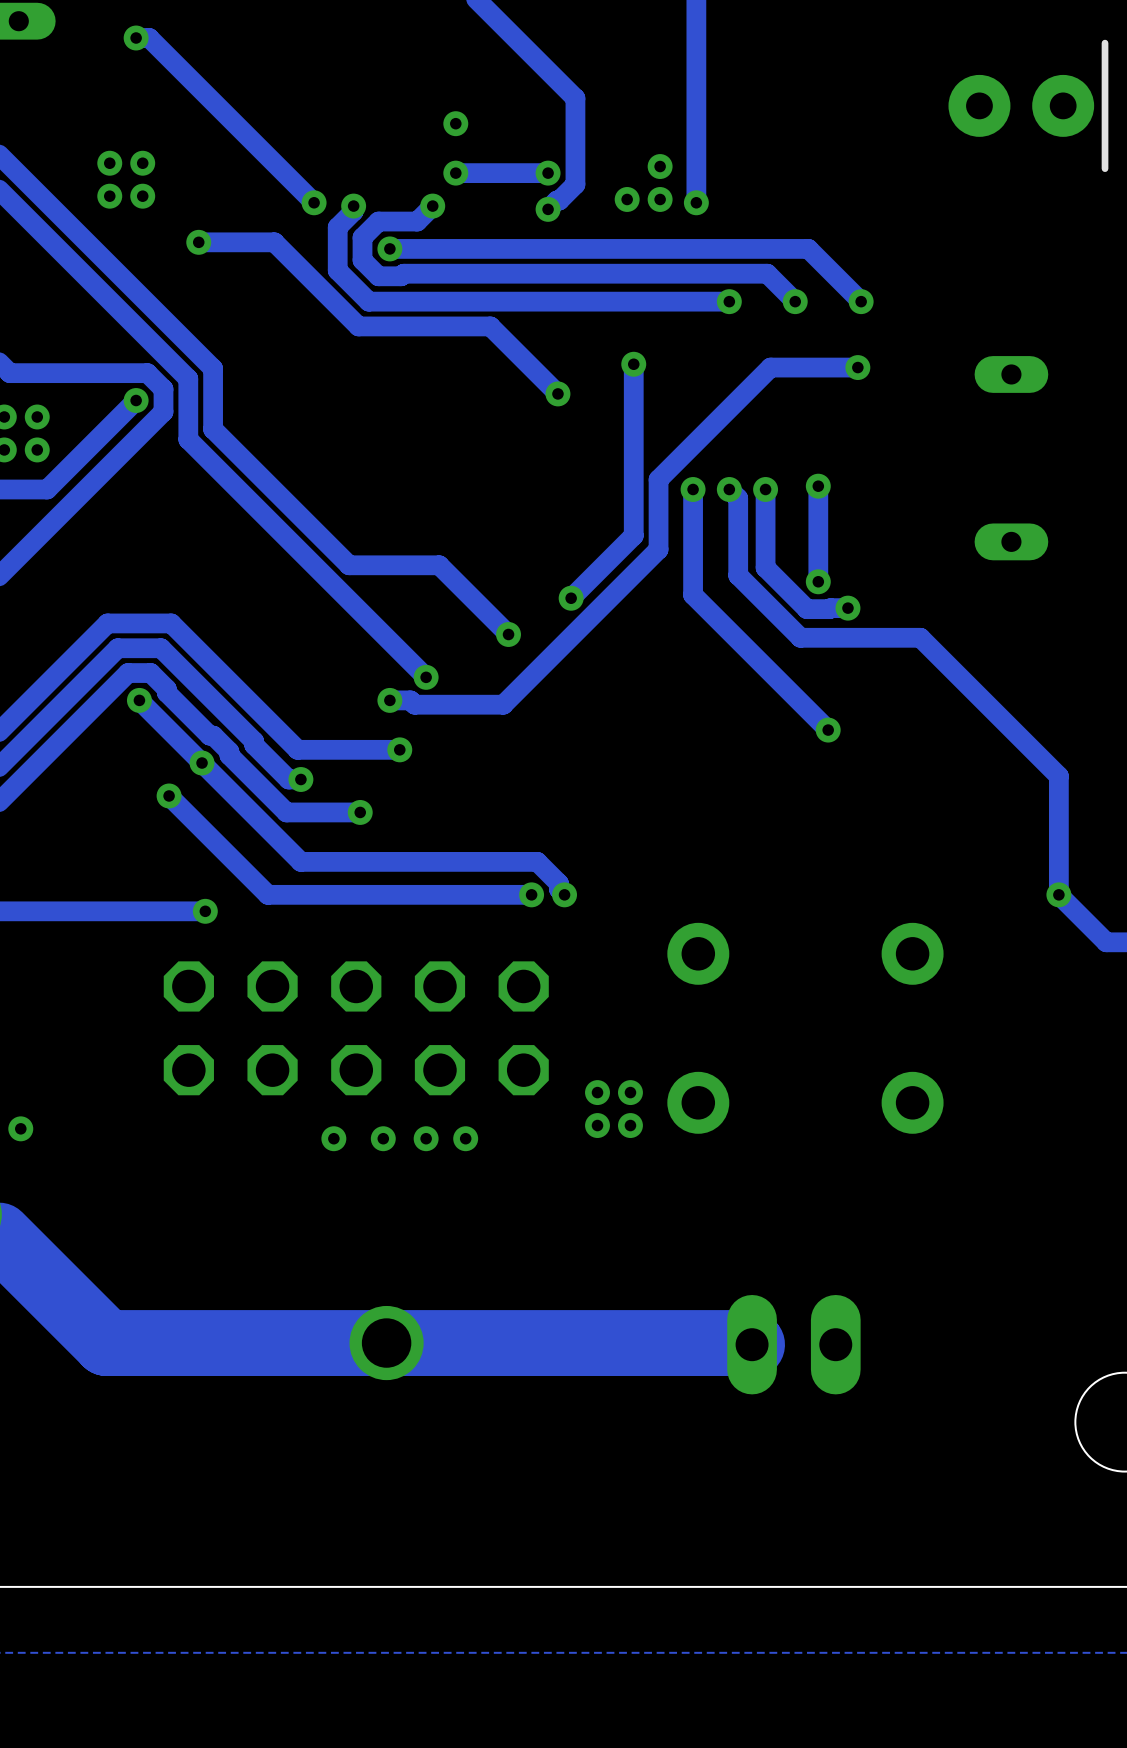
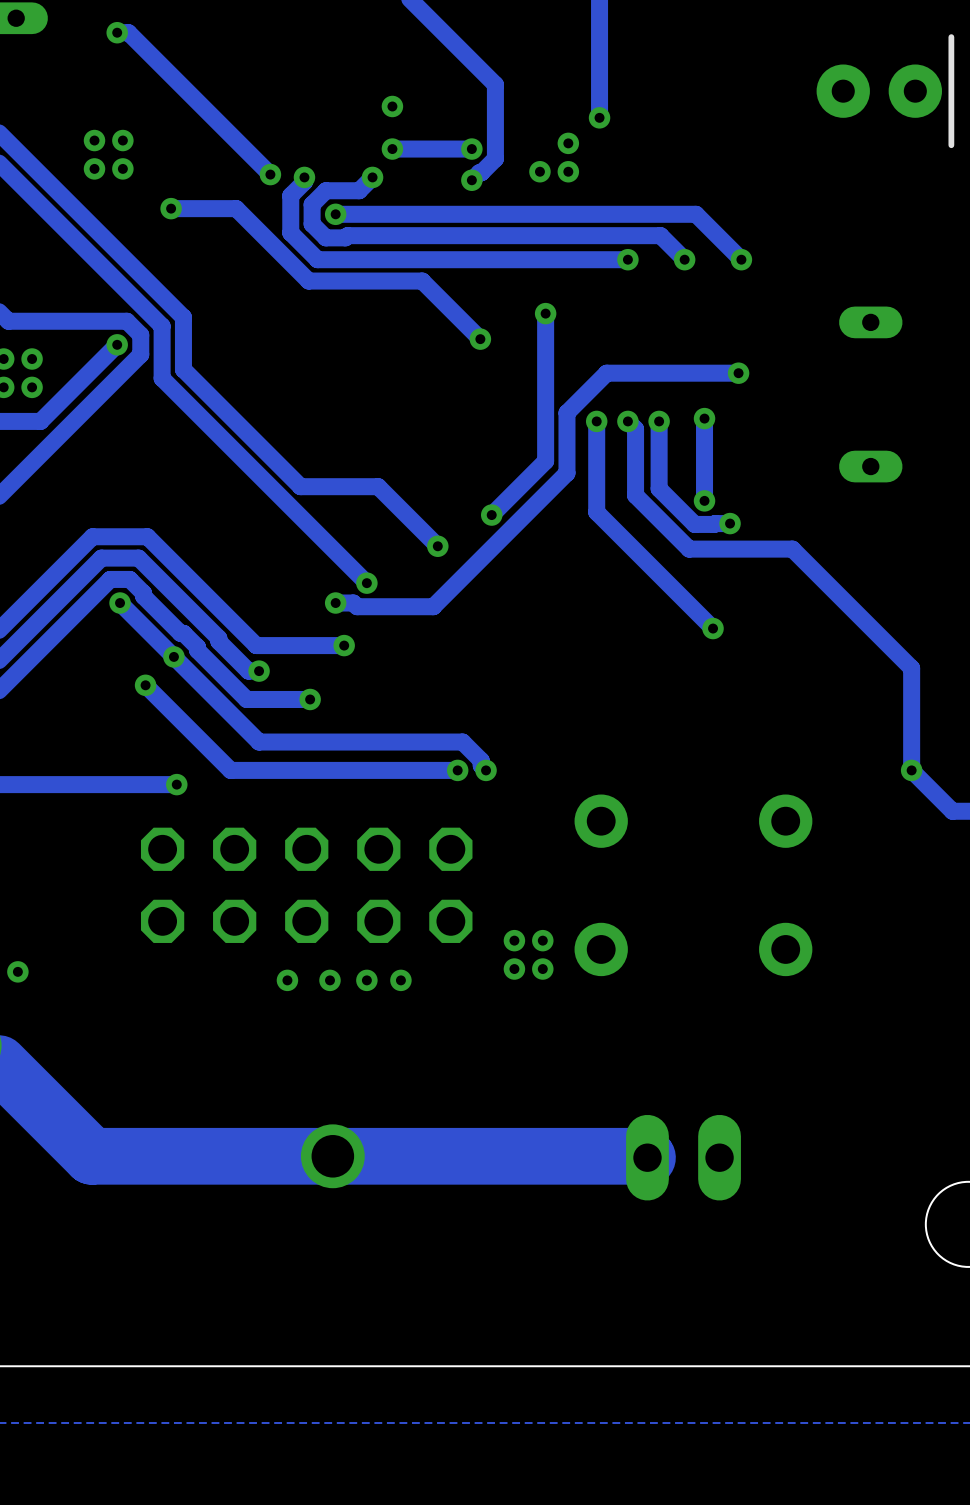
track: (696, 136) (696, 202) -> none
via position: (696, 202) -> (599, 117)
track: (857, 367) (770, 367) (704, 433) -> (738, 373) (606, 373)
via position: (857, 367) -> (738, 373)

